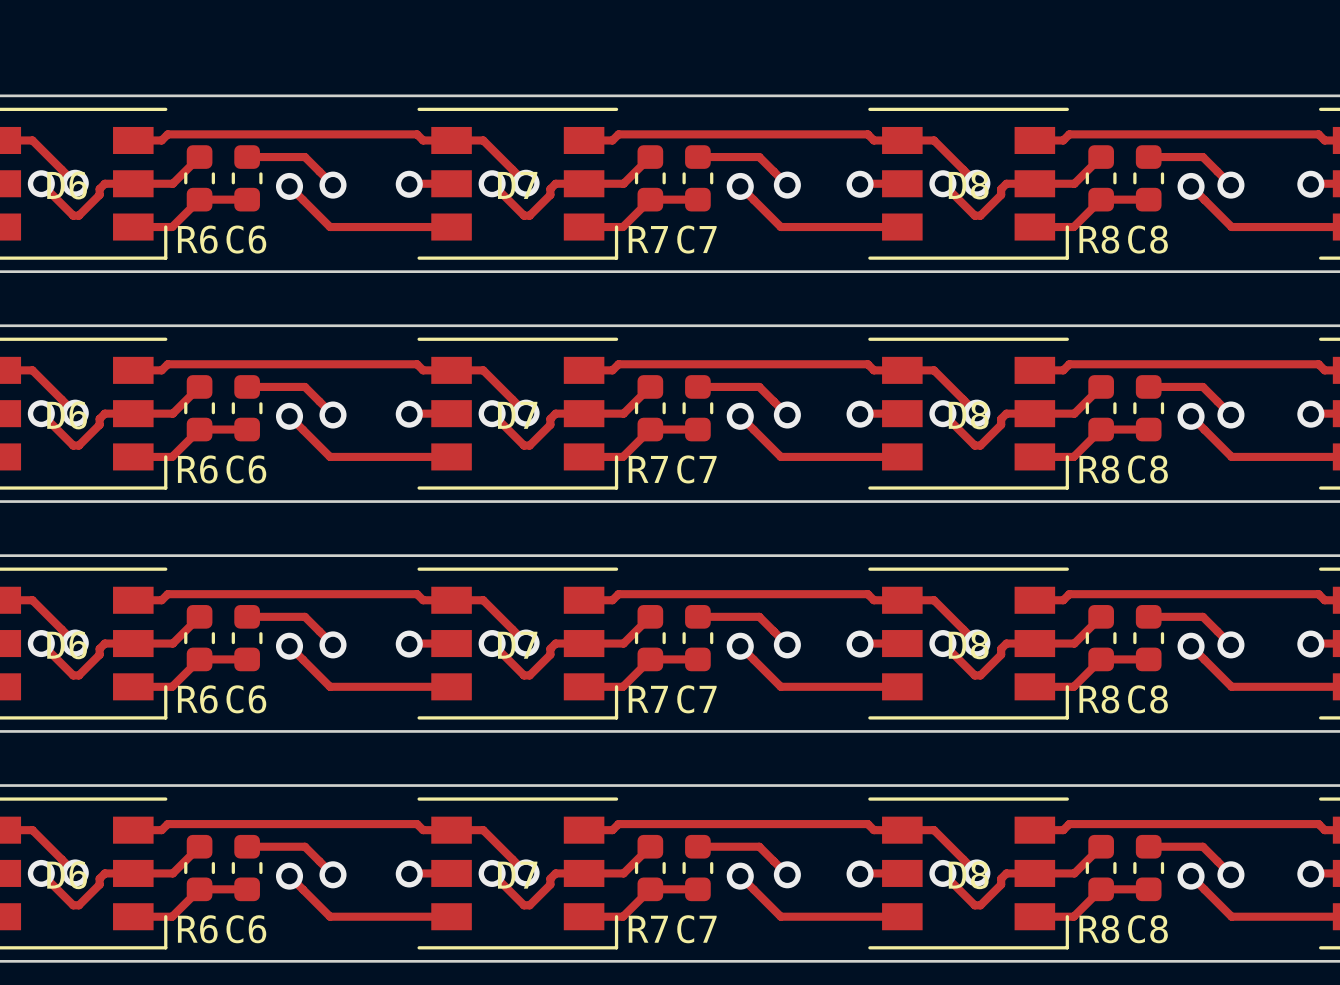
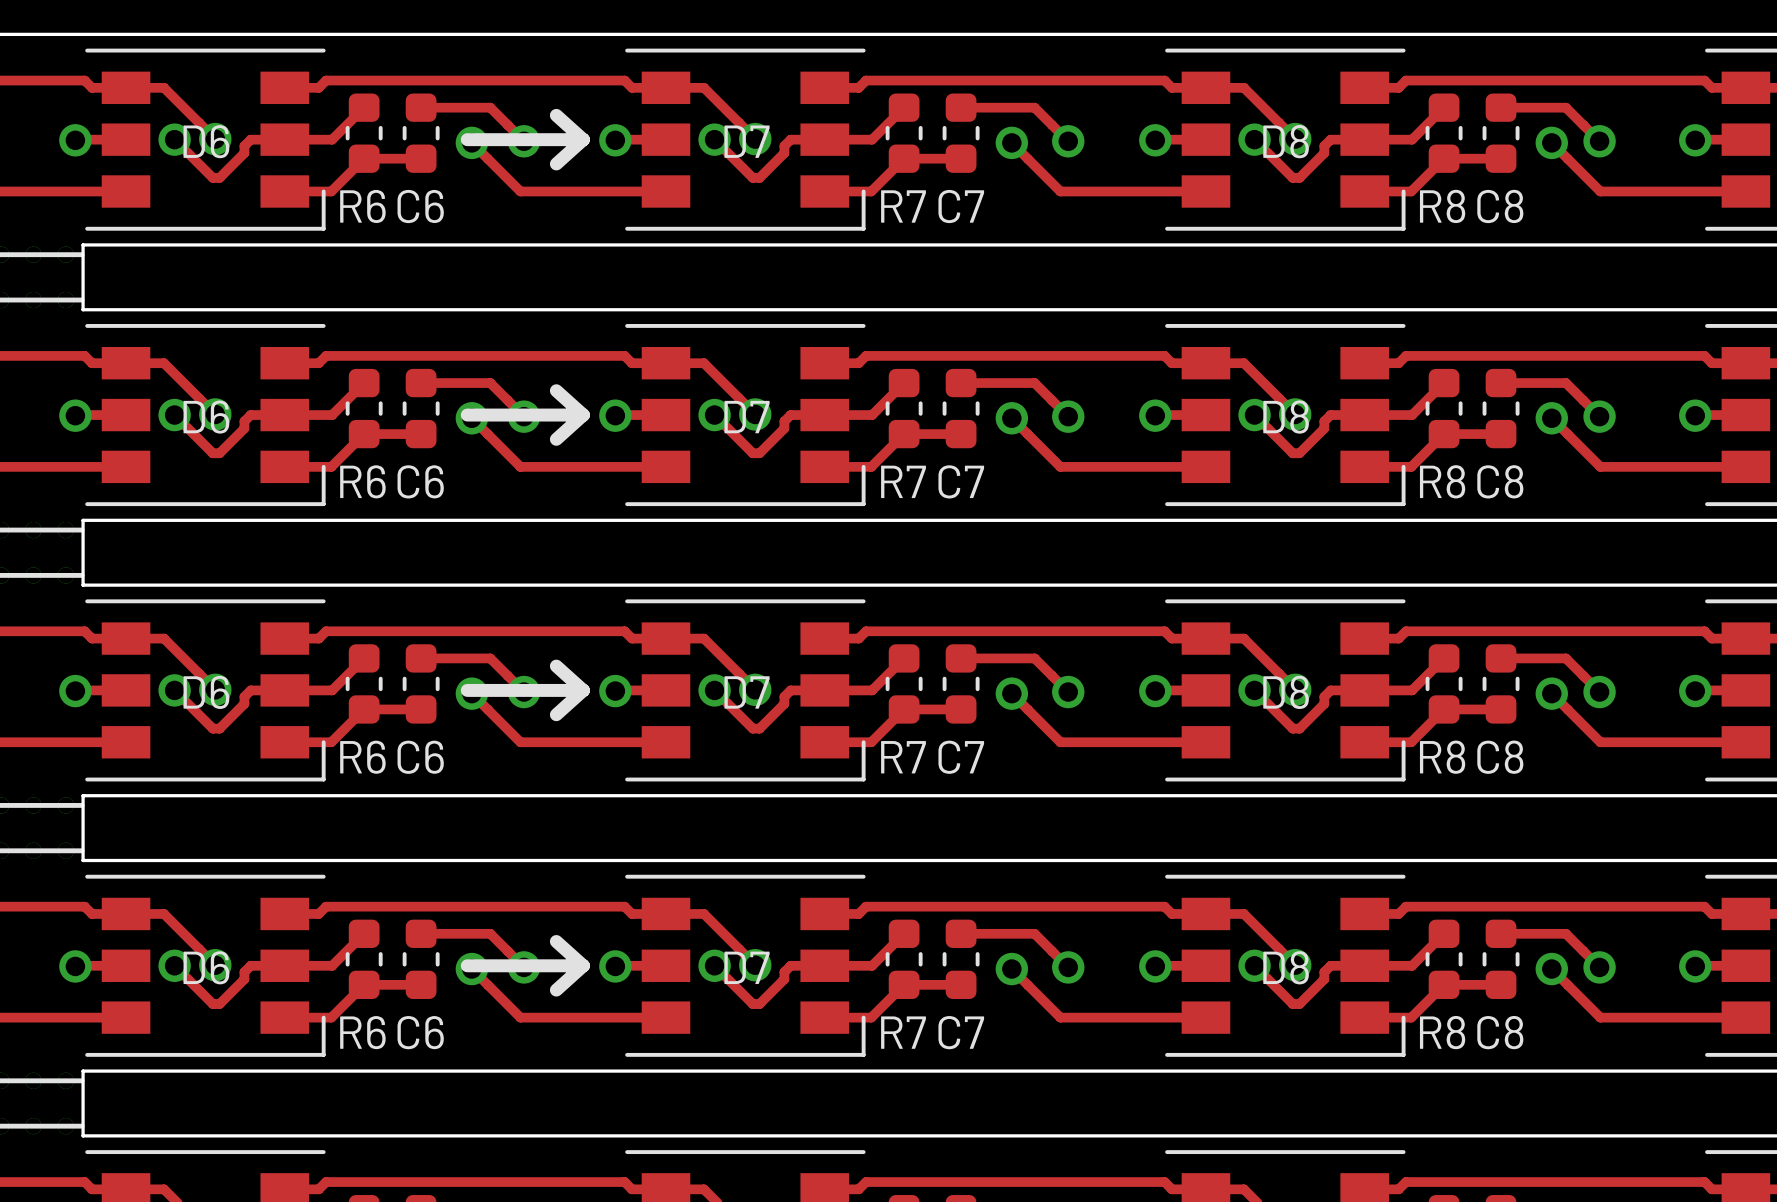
line: none -> (556, 115) (583, 139)
line: none -> (467, 139) (583, 139)
line: none -> (583, 139) (556, 163)
line: none -> (556, 390) (583, 415)
line: none -> (467, 415) (583, 415)
line: none -> (583, 415) (556, 439)
line: none -> (556, 666) (583, 690)
line: none -> (467, 690) (583, 690)
line: none -> (583, 690) (556, 714)
line: none -> (556, 941) (583, 965)
line: none -> (467, 965) (583, 965)
line: none -> (583, 965) (556, 990)

